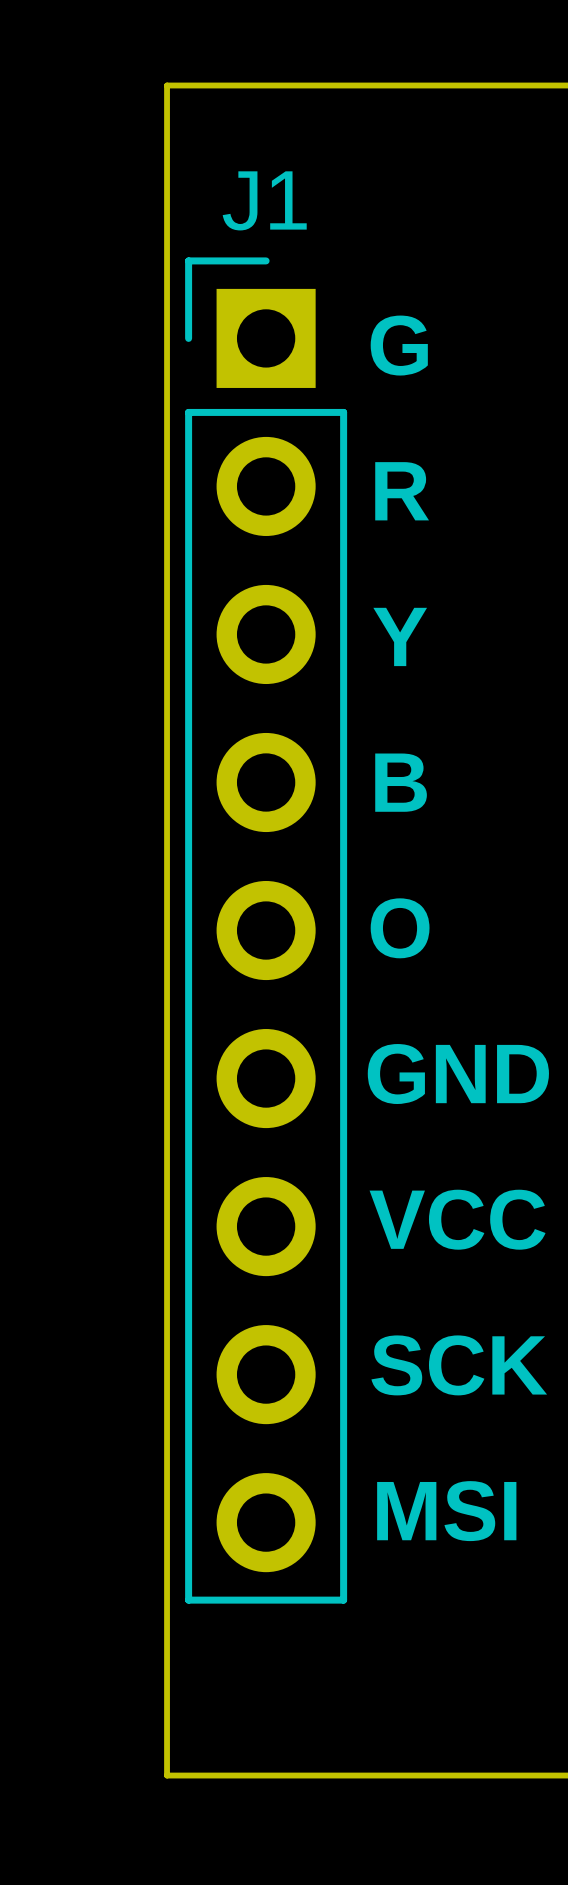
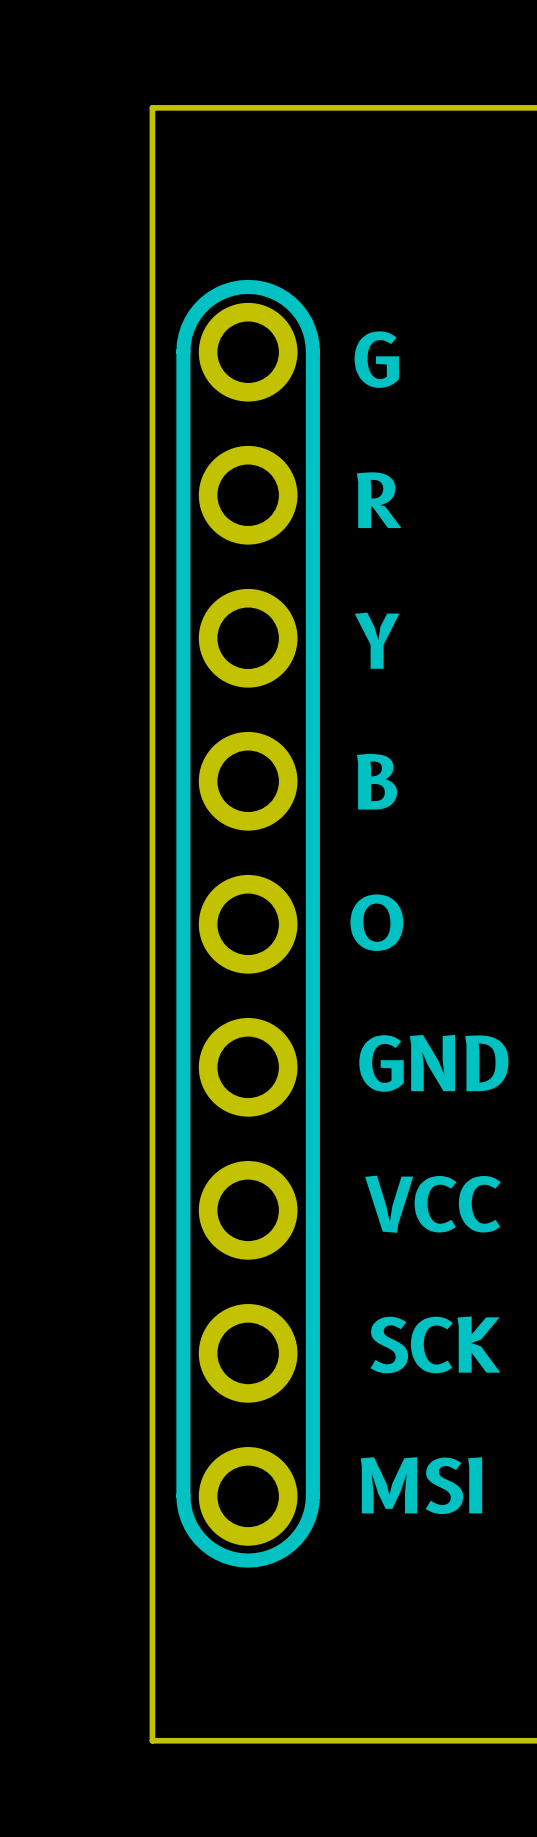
line: none -> (183, 351) (183, 1495) (185, 1511) (190, 1525) (205, 1544) (225, 1556) (248, 1560) (271, 1556) (291, 1544) (301, 1532) (308, 1518) (312, 1495) (312, 351) (308, 328) (296, 308) (284, 298) (271, 291) (248, 286) (225, 291) (211, 298) (199, 308) (187, 328) (183, 351)
part: none -> (248, 352)
part: none -> (248, 495)
part: none -> (248, 638)
part: none -> (248, 781)
J1: (266, 930) -> none
part: none -> (248, 924)
part: none -> (248, 1067)
part: none -> (248, 1210)
part: none -> (248, 1353)
part: none -> (248, 1496)

